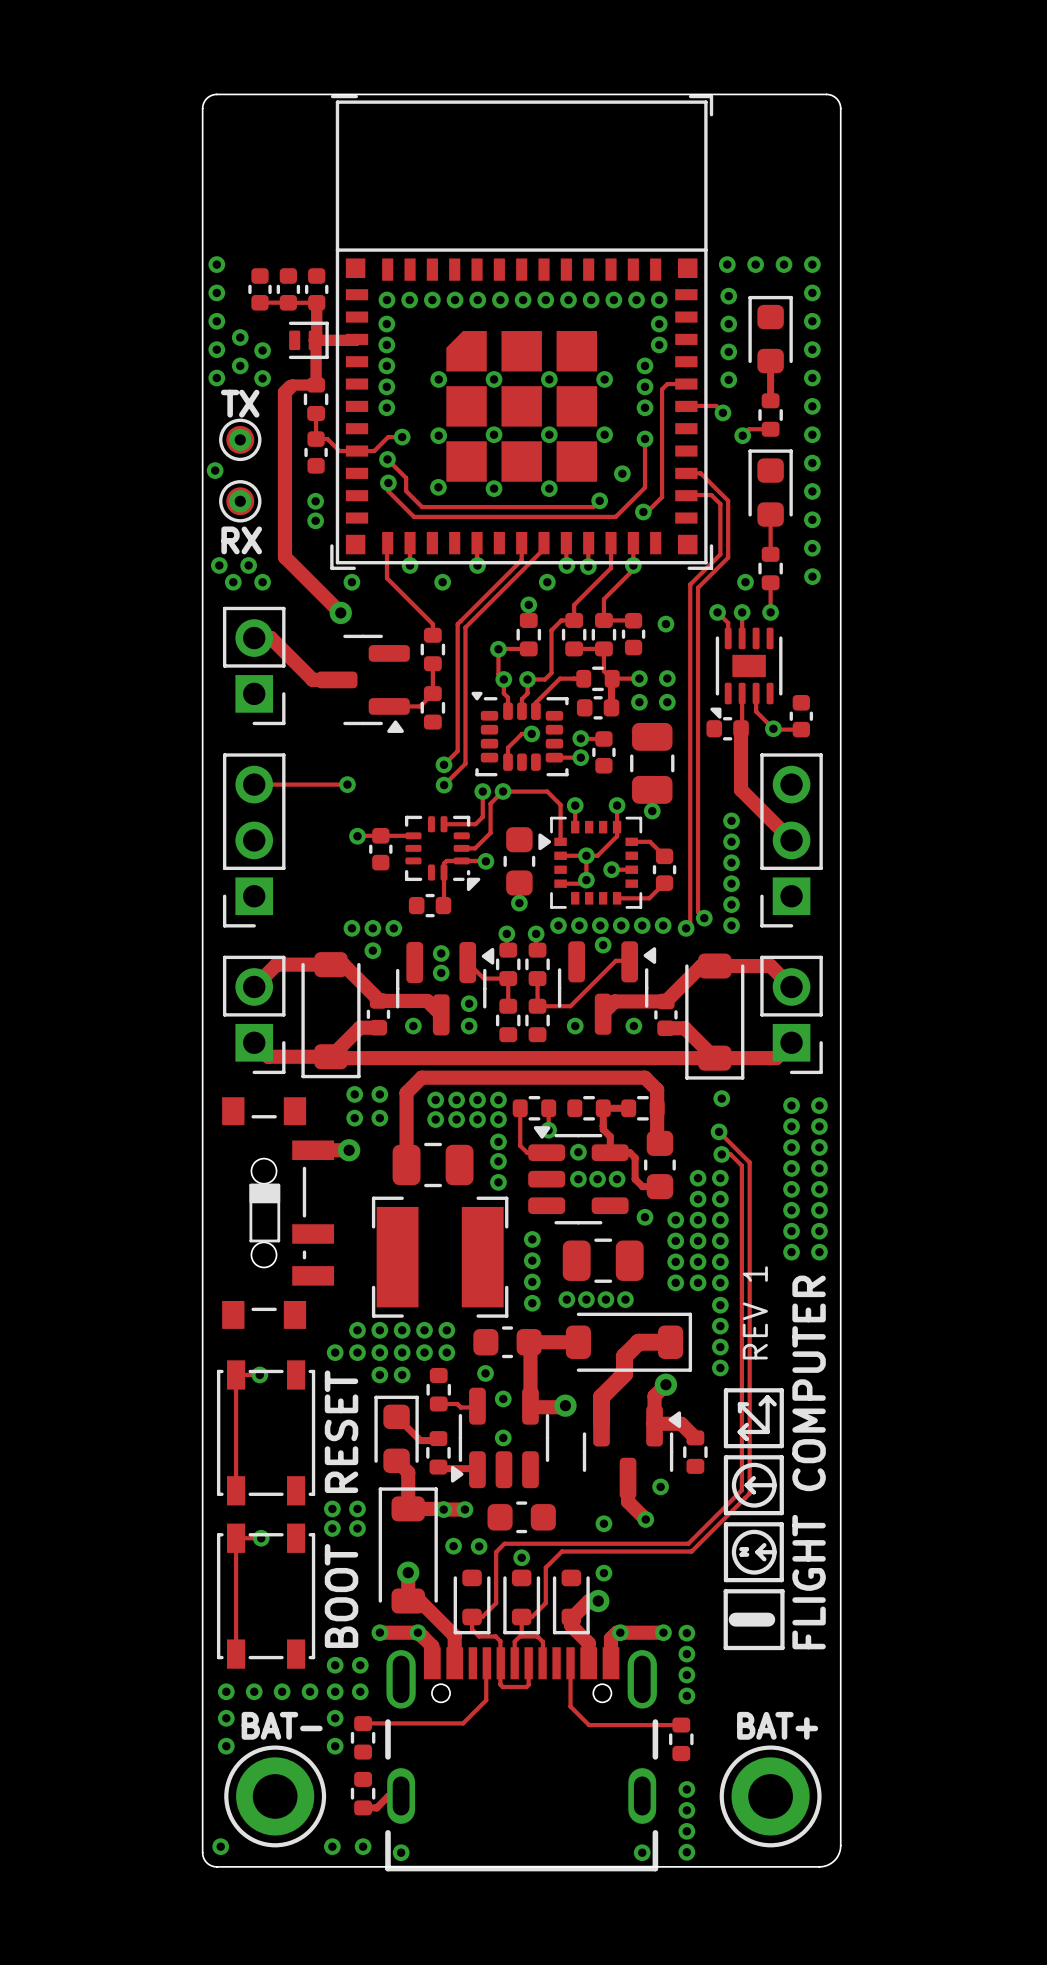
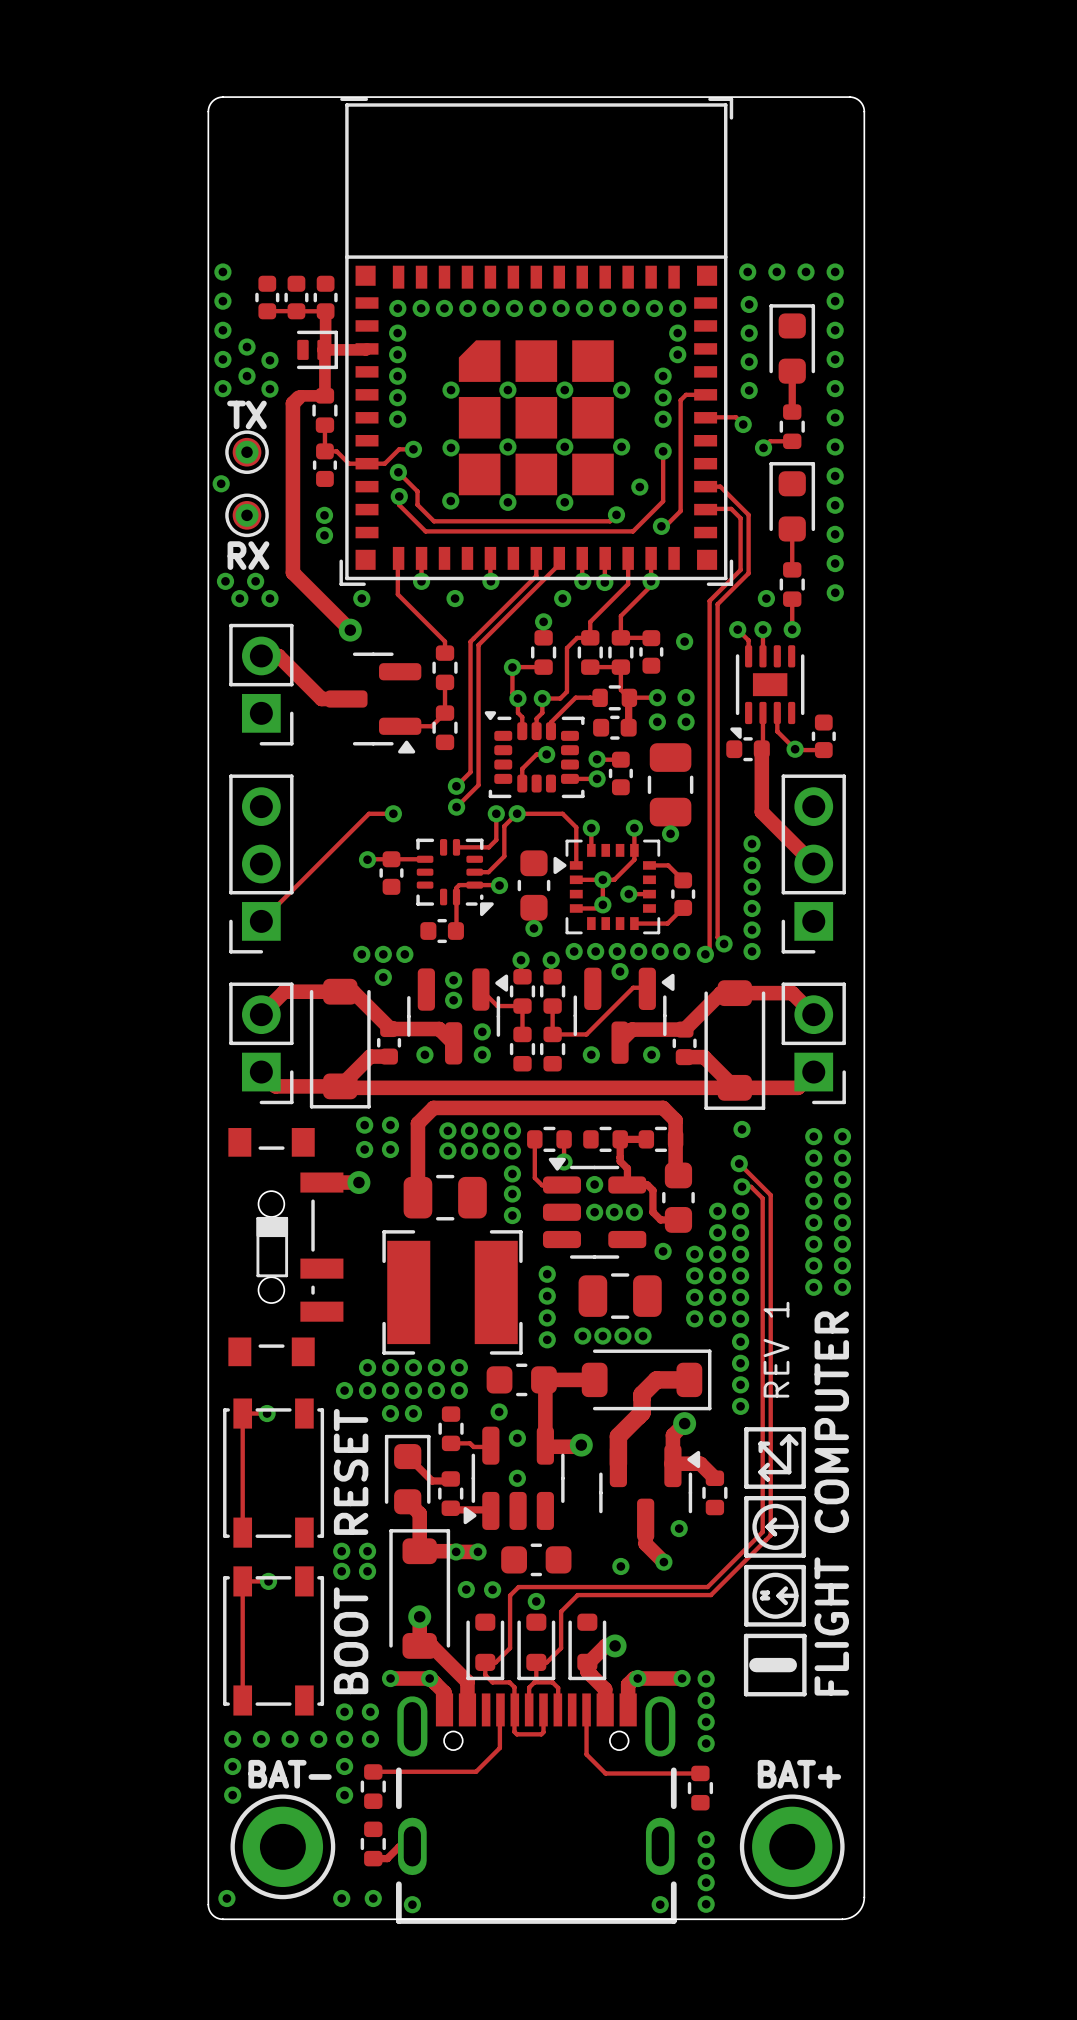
track: (254, 784) (347, 784) -> none
via position: (347, 784) -> (393, 813)
track: none -> (393, 813) (368, 813) (261, 921)
via: (603, 1573) -> none

